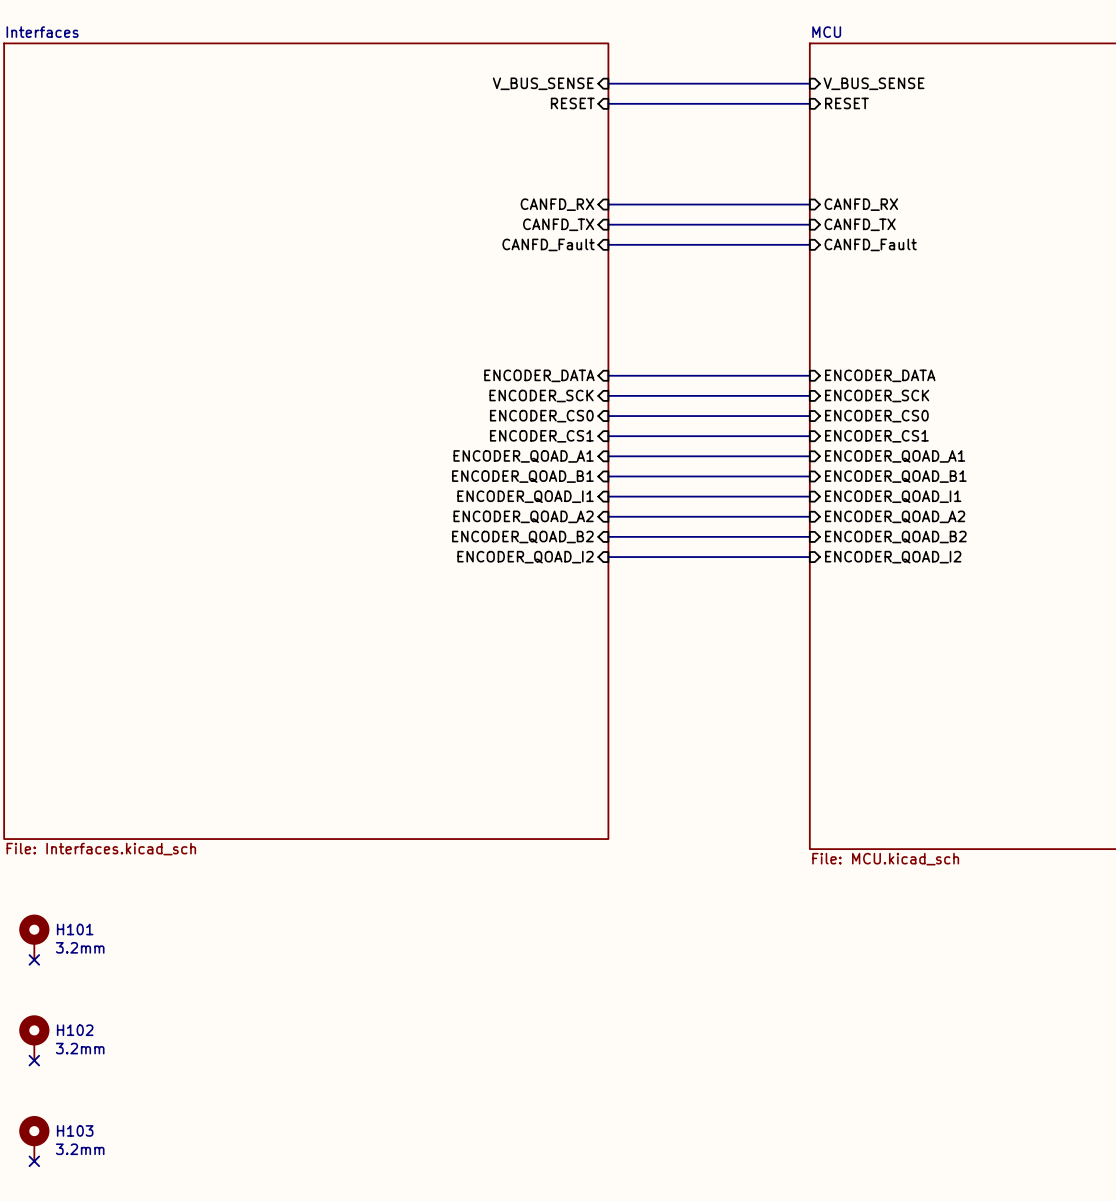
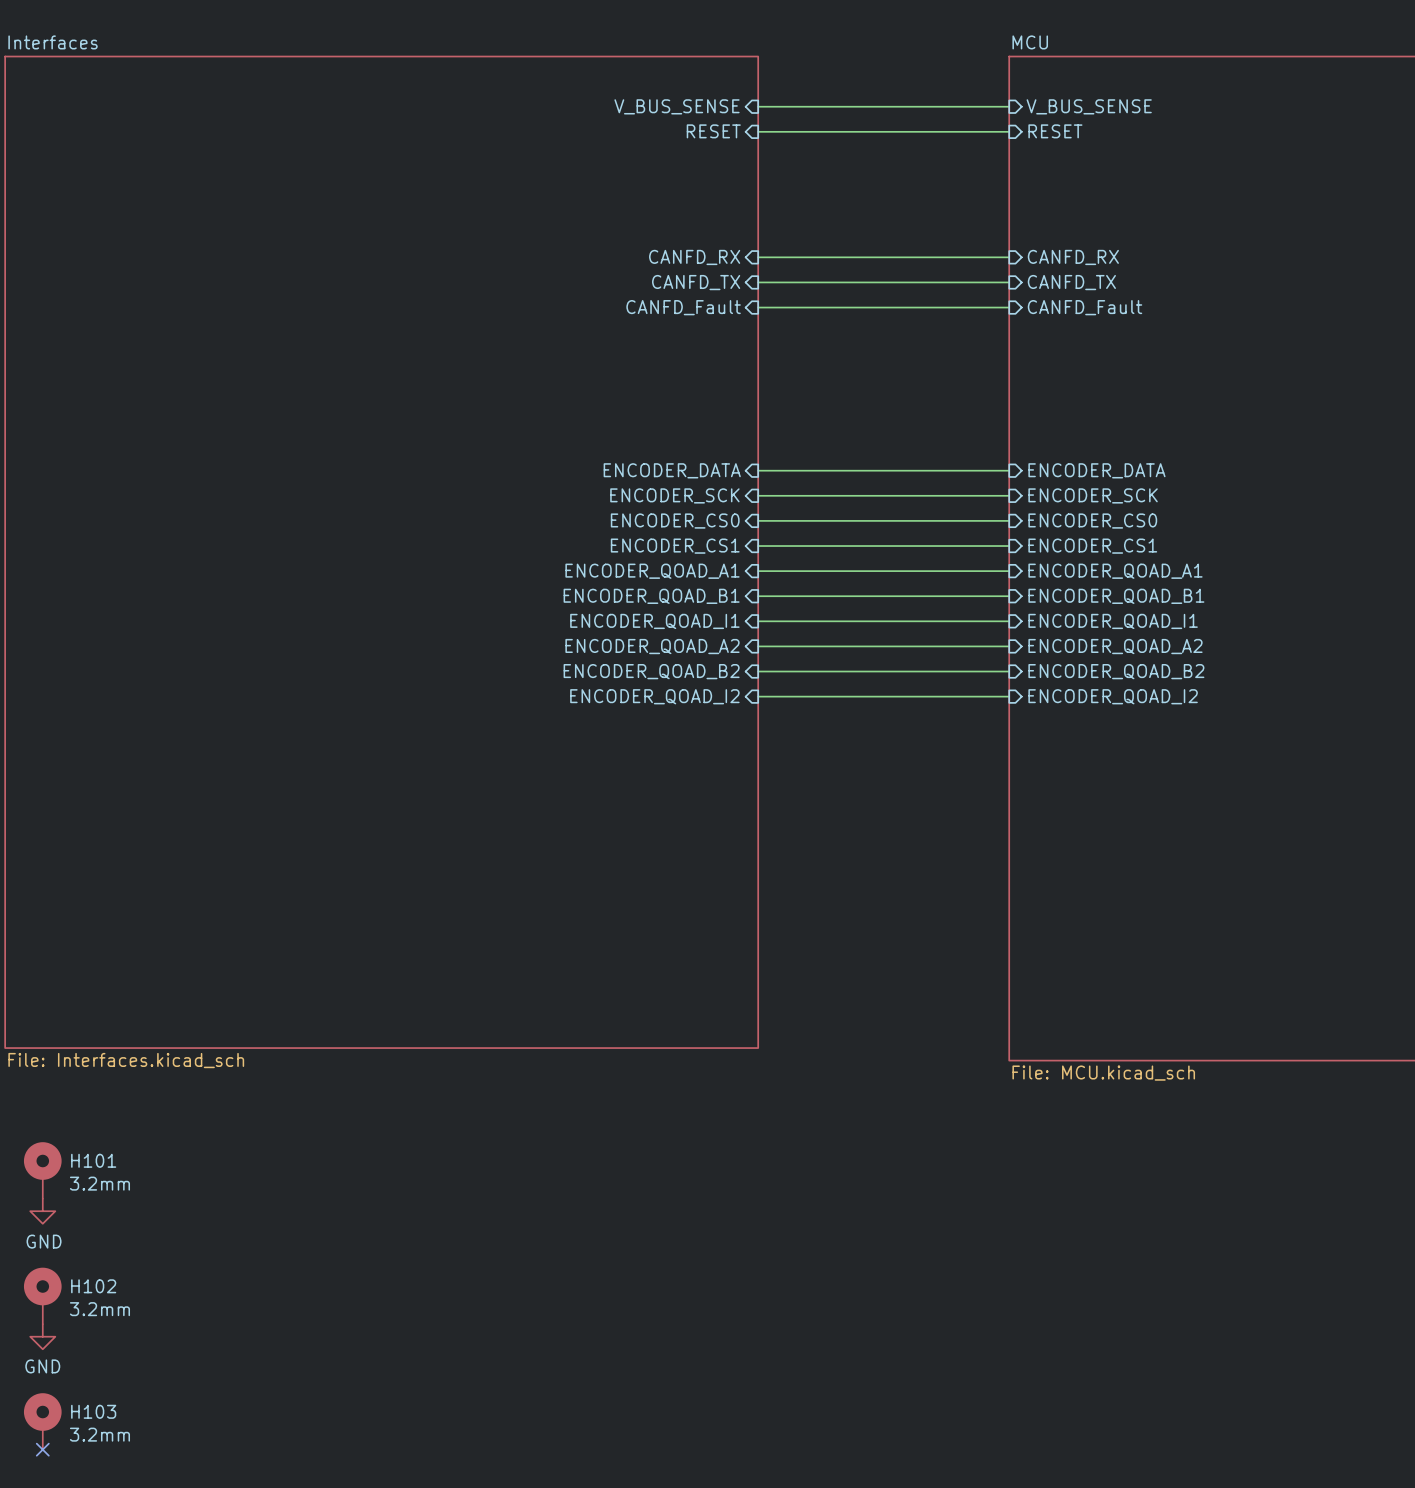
no-connect mark: (34, 959) -> none
power symbol: none -> GND (42, 1211)
no-connect mark: (34, 1060) -> none
power symbol: none -> GND (42, 1336)

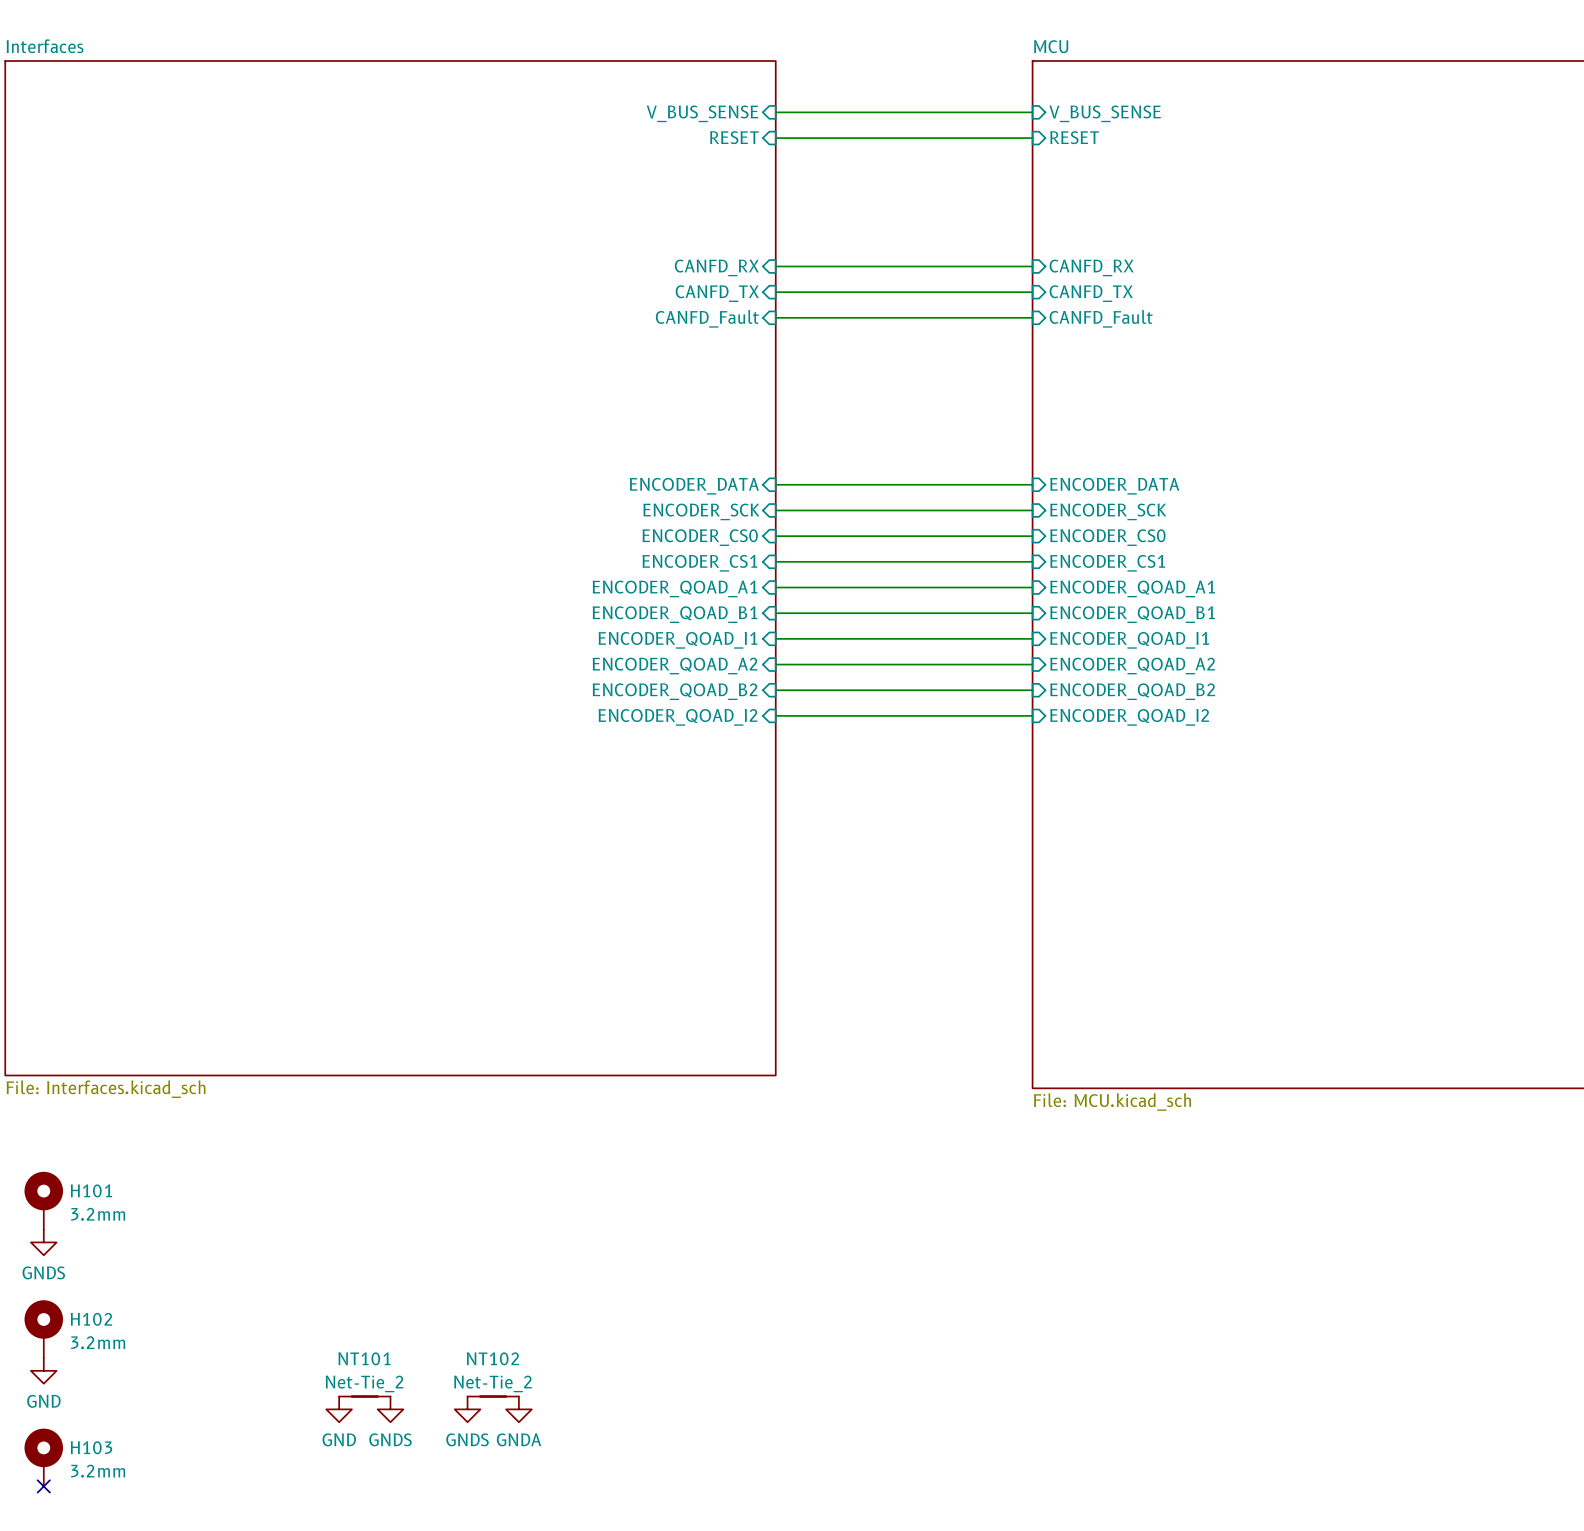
power symbol: GND (42, 1211) -> GNDS (43, 1242)
NT101: none -> Net-Tie_2 (364, 1396)
NT102: none -> Net-Tie_2 (493, 1396)
power symbol: none -> GND (339, 1409)
power symbol: none -> GNDS (390, 1409)
power symbol: none -> GNDS (467, 1409)
power symbol: none -> GNDA (518, 1409)

